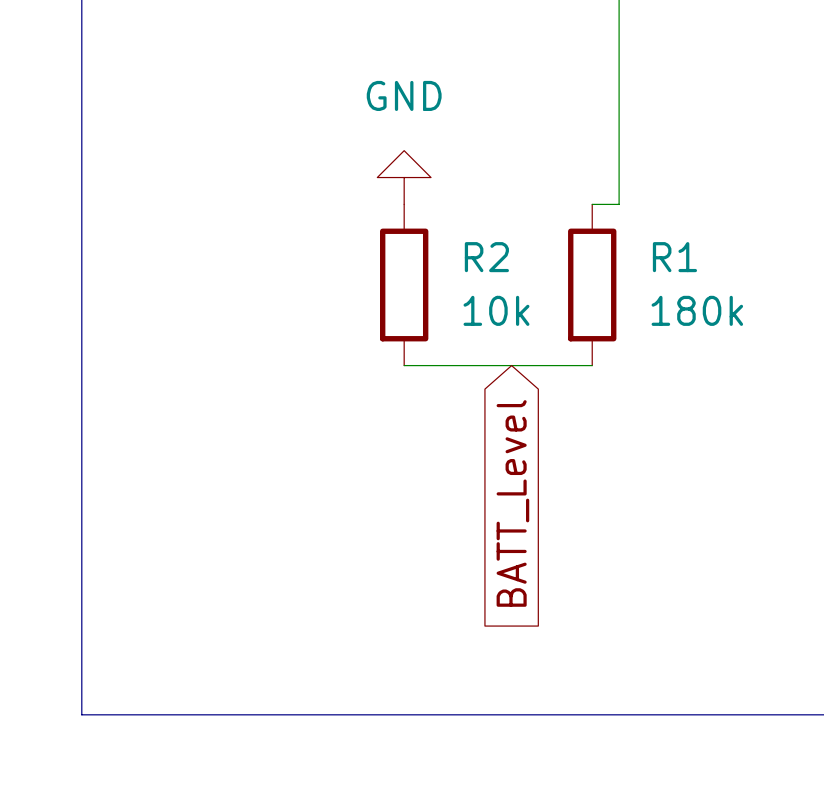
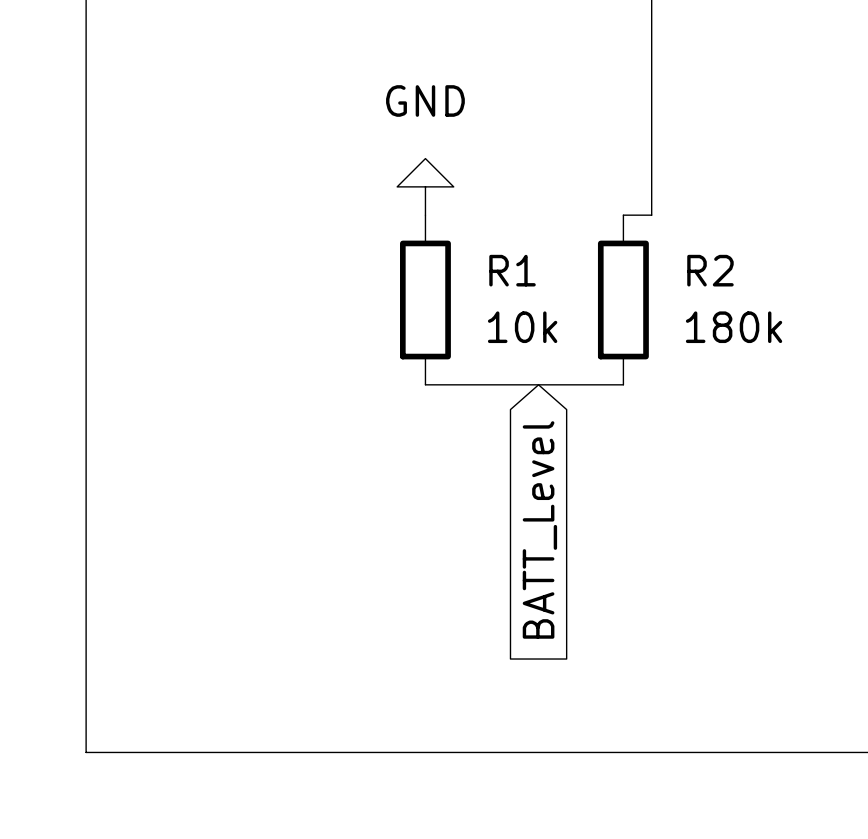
R2 name: R2 (486, 257) -> R1 (512, 270)
R1 name: R1 (674, 257) -> R2 (710, 270)

